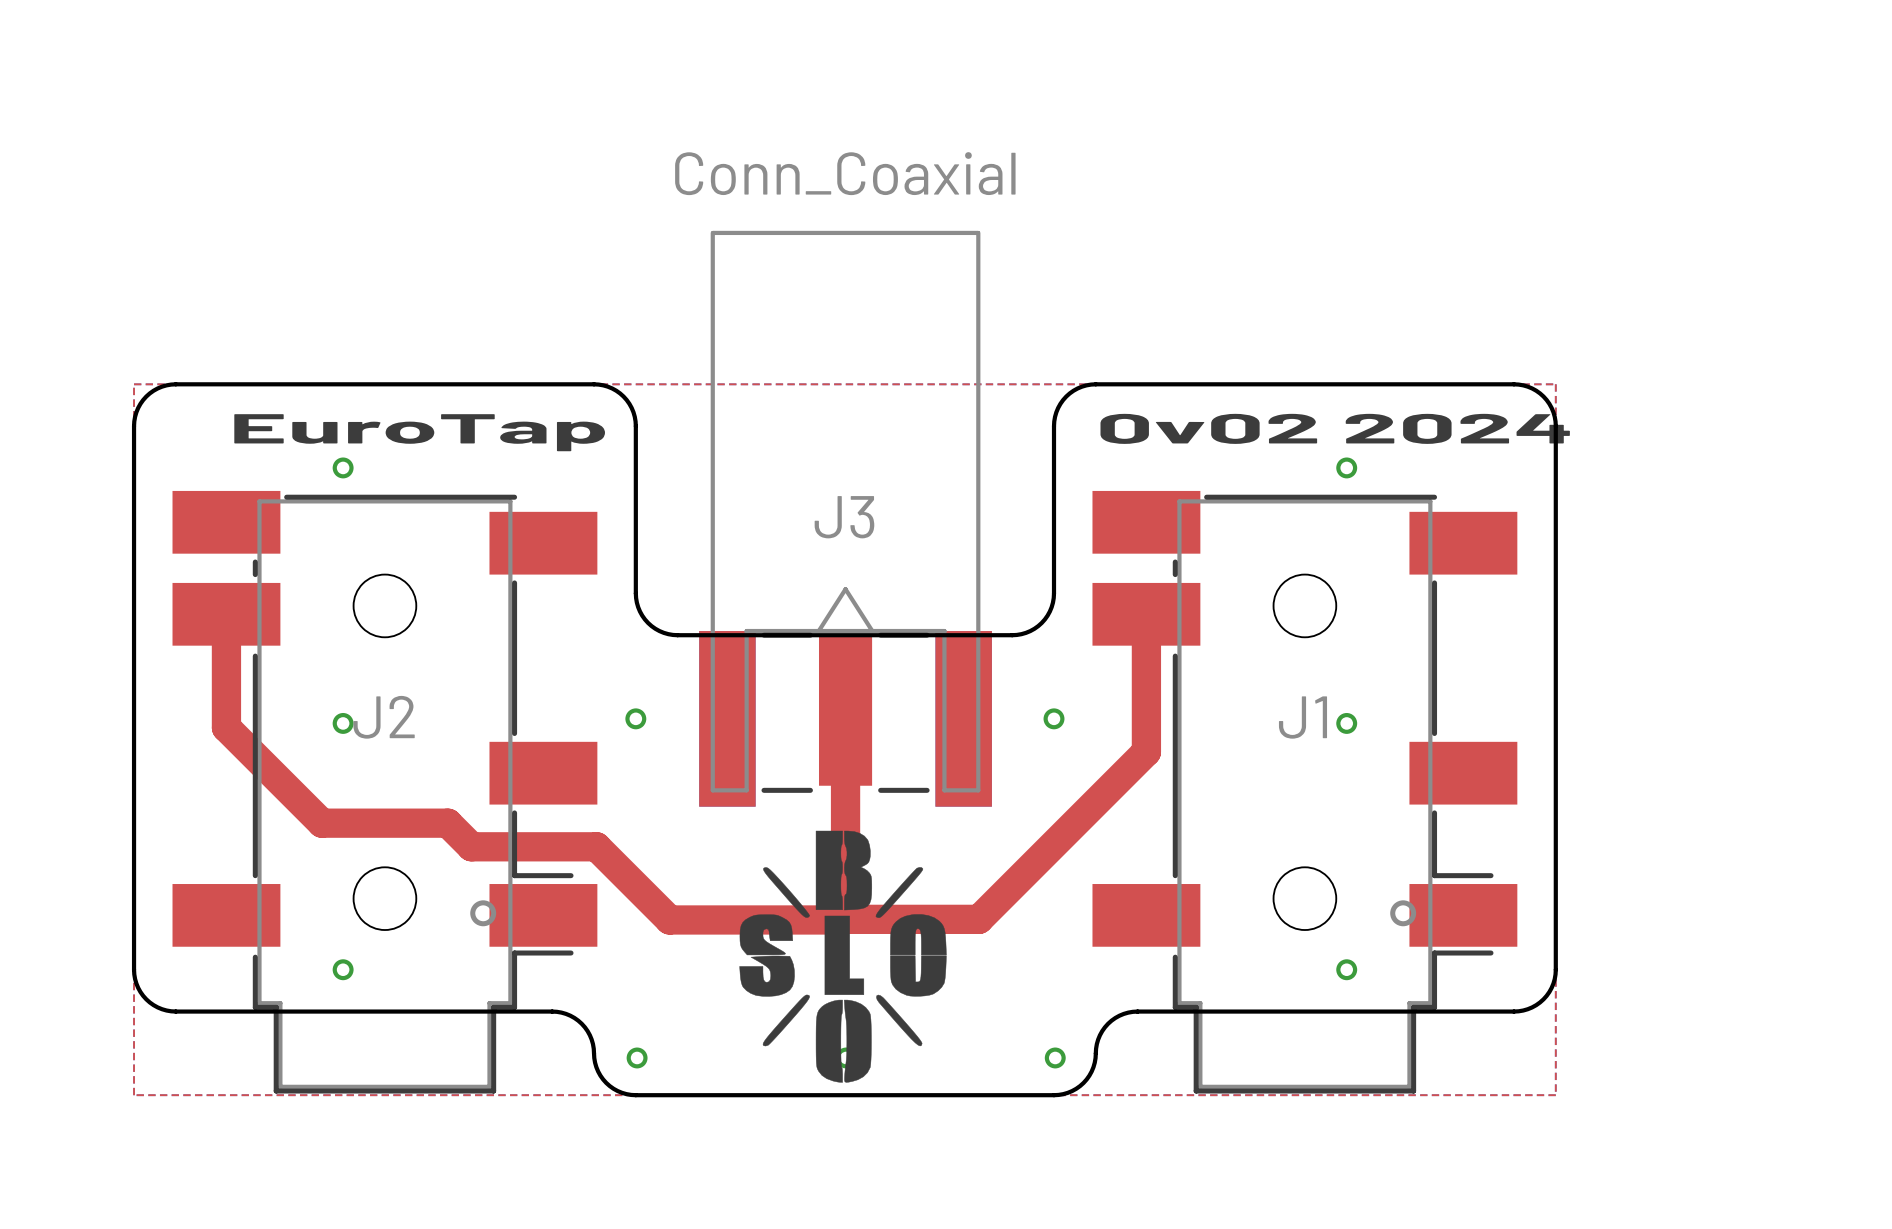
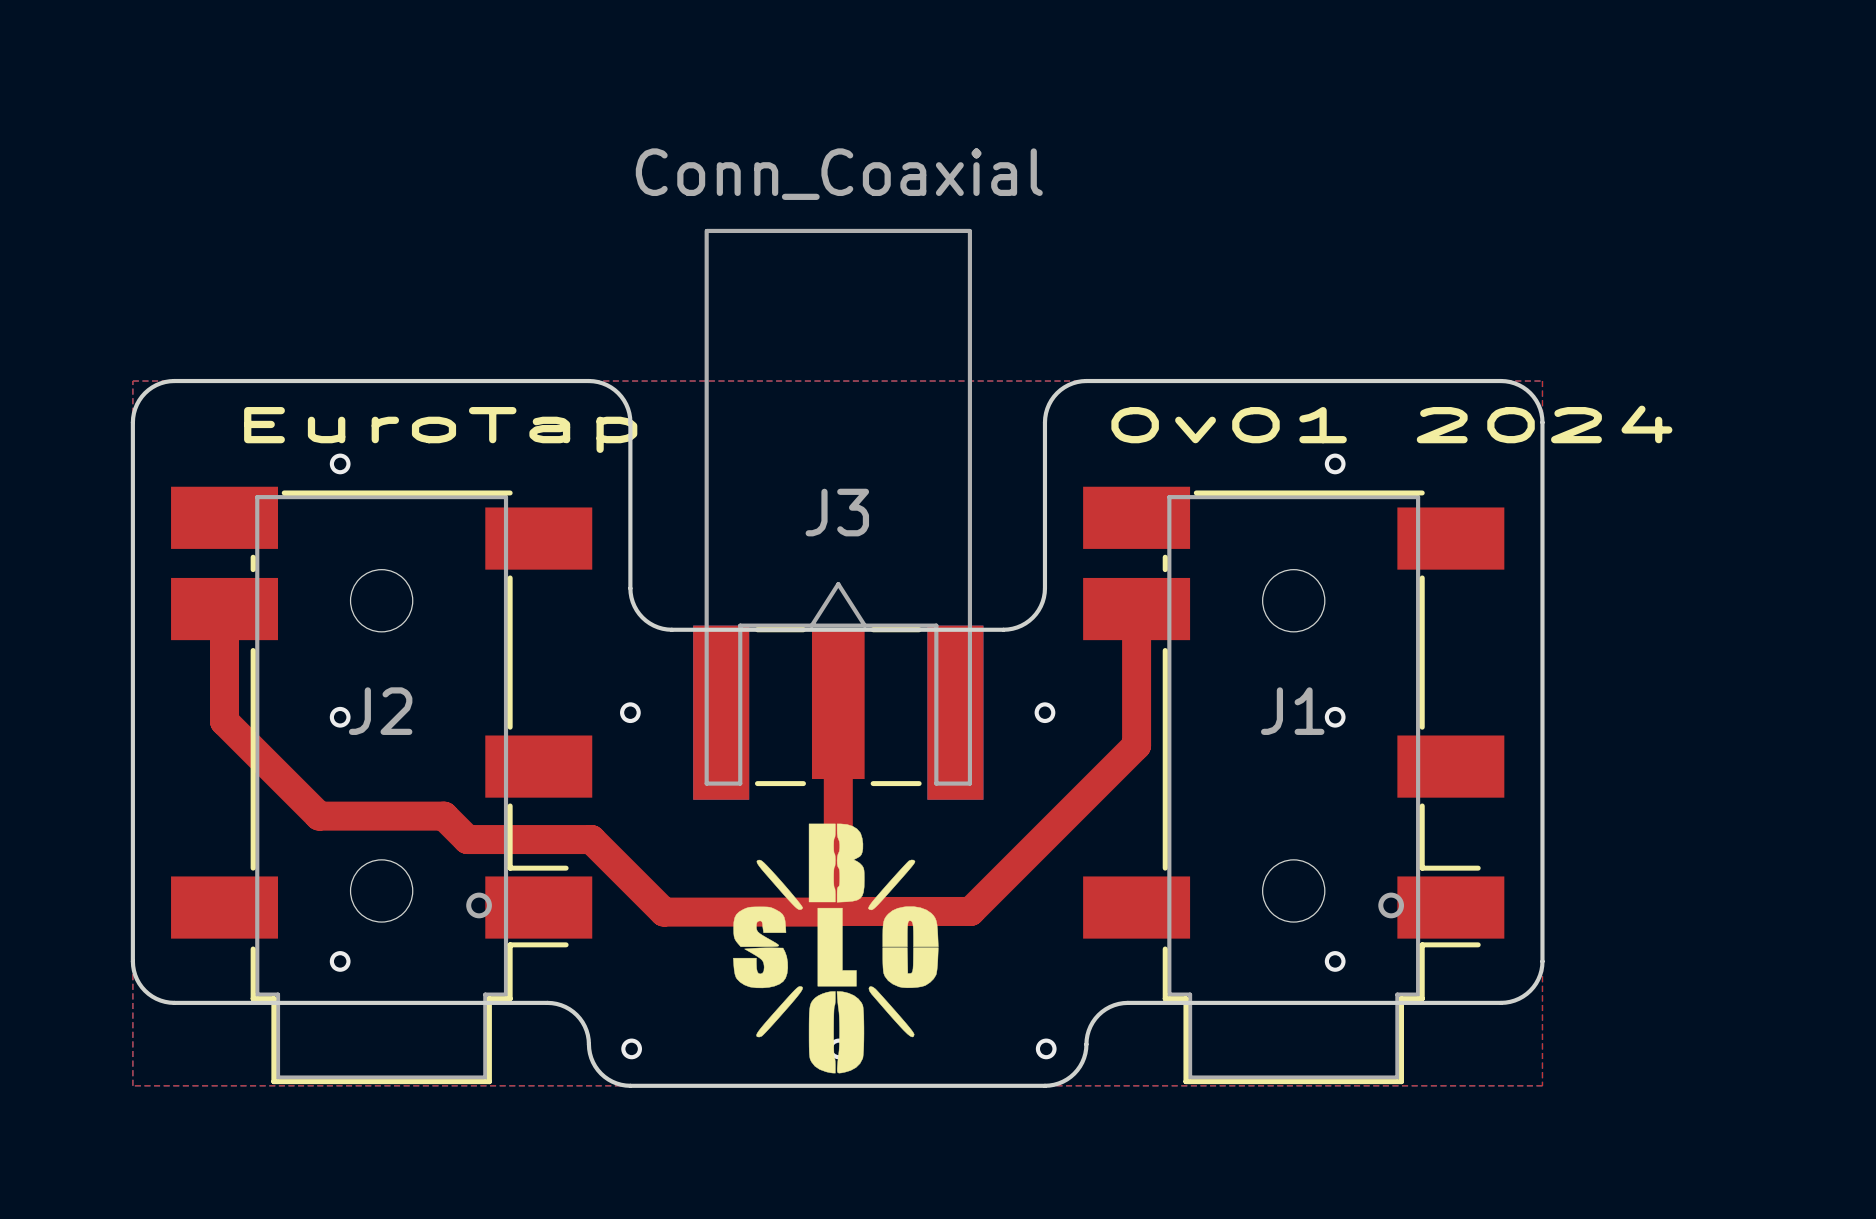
text: 0v02 2024 (1335, 428) -> 0v01 2024 (1391, 424)

